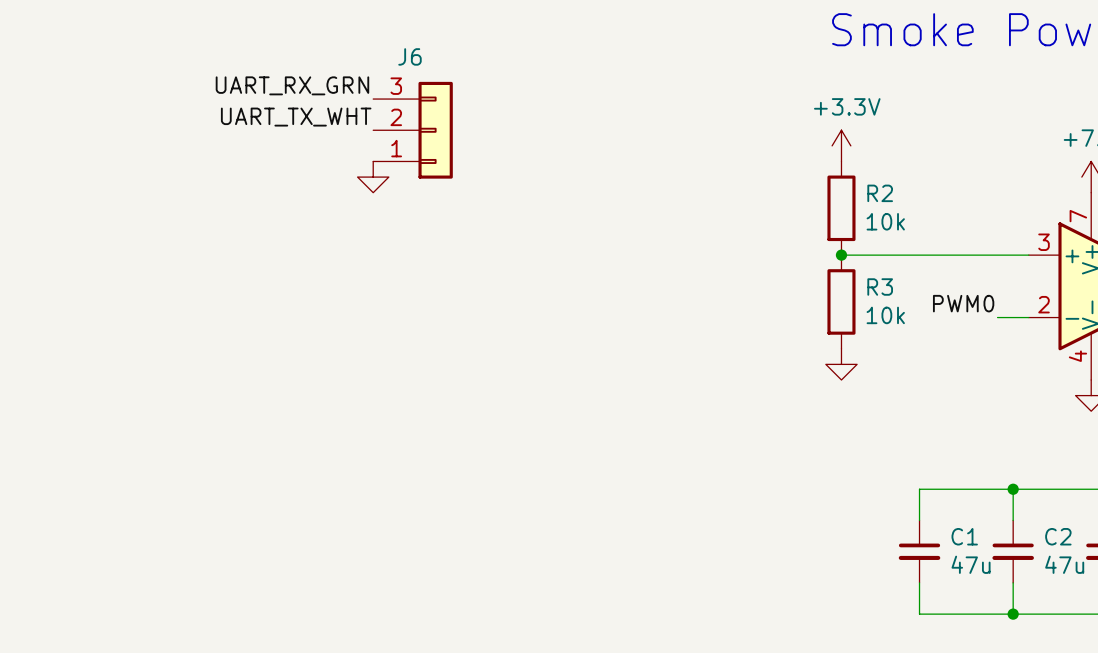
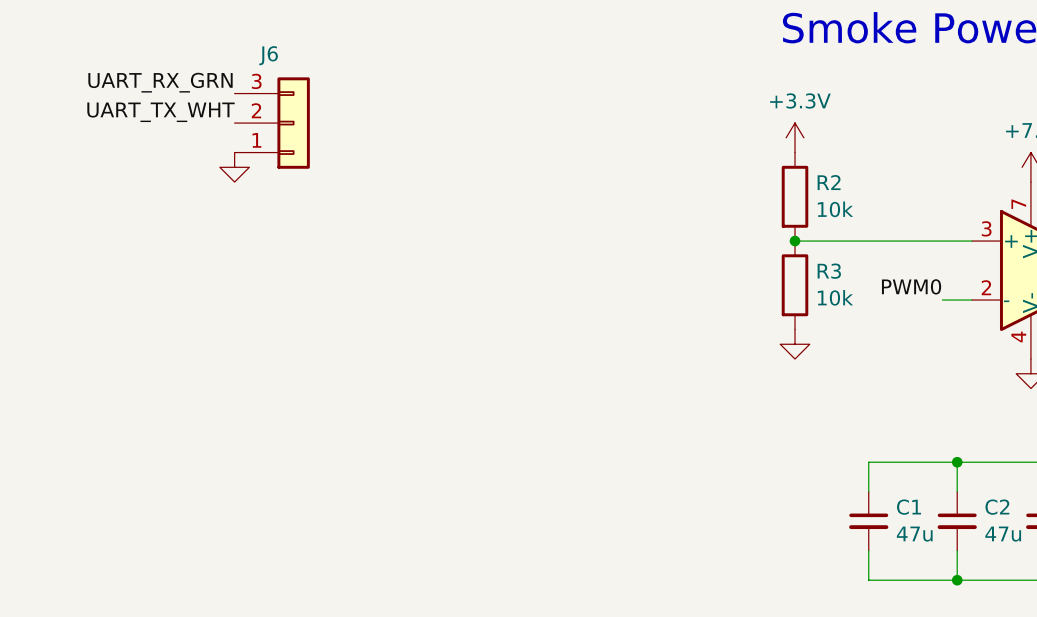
label position: UART_RX_GRN (292, 85) -> UART_RX_GRN (160, 82)
label position: UART_TX_WHT (296, 117) -> UART_TX_WHT (161, 112)
J6 position: (413, 130) -> (272, 123)
power symbol position: (373, 177) -> (234, 167)

